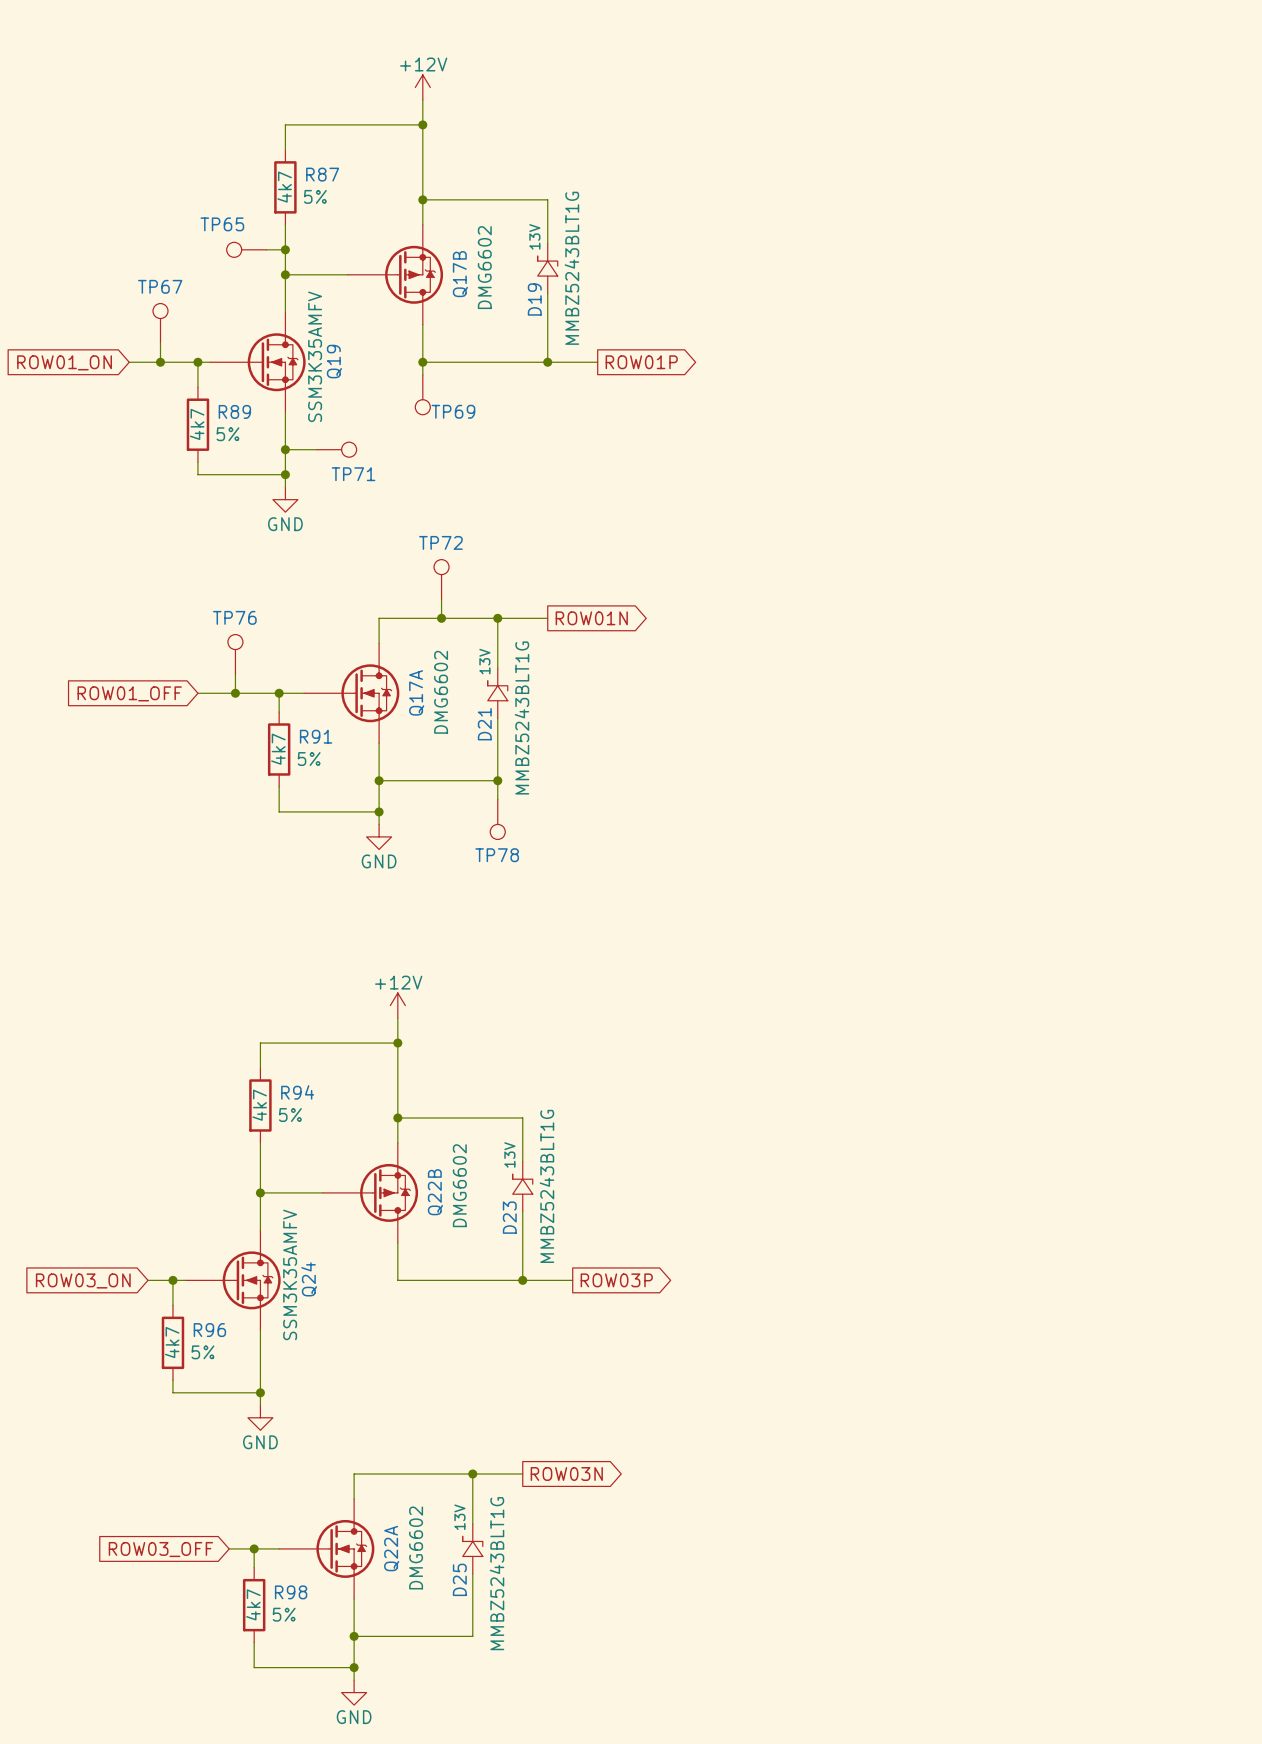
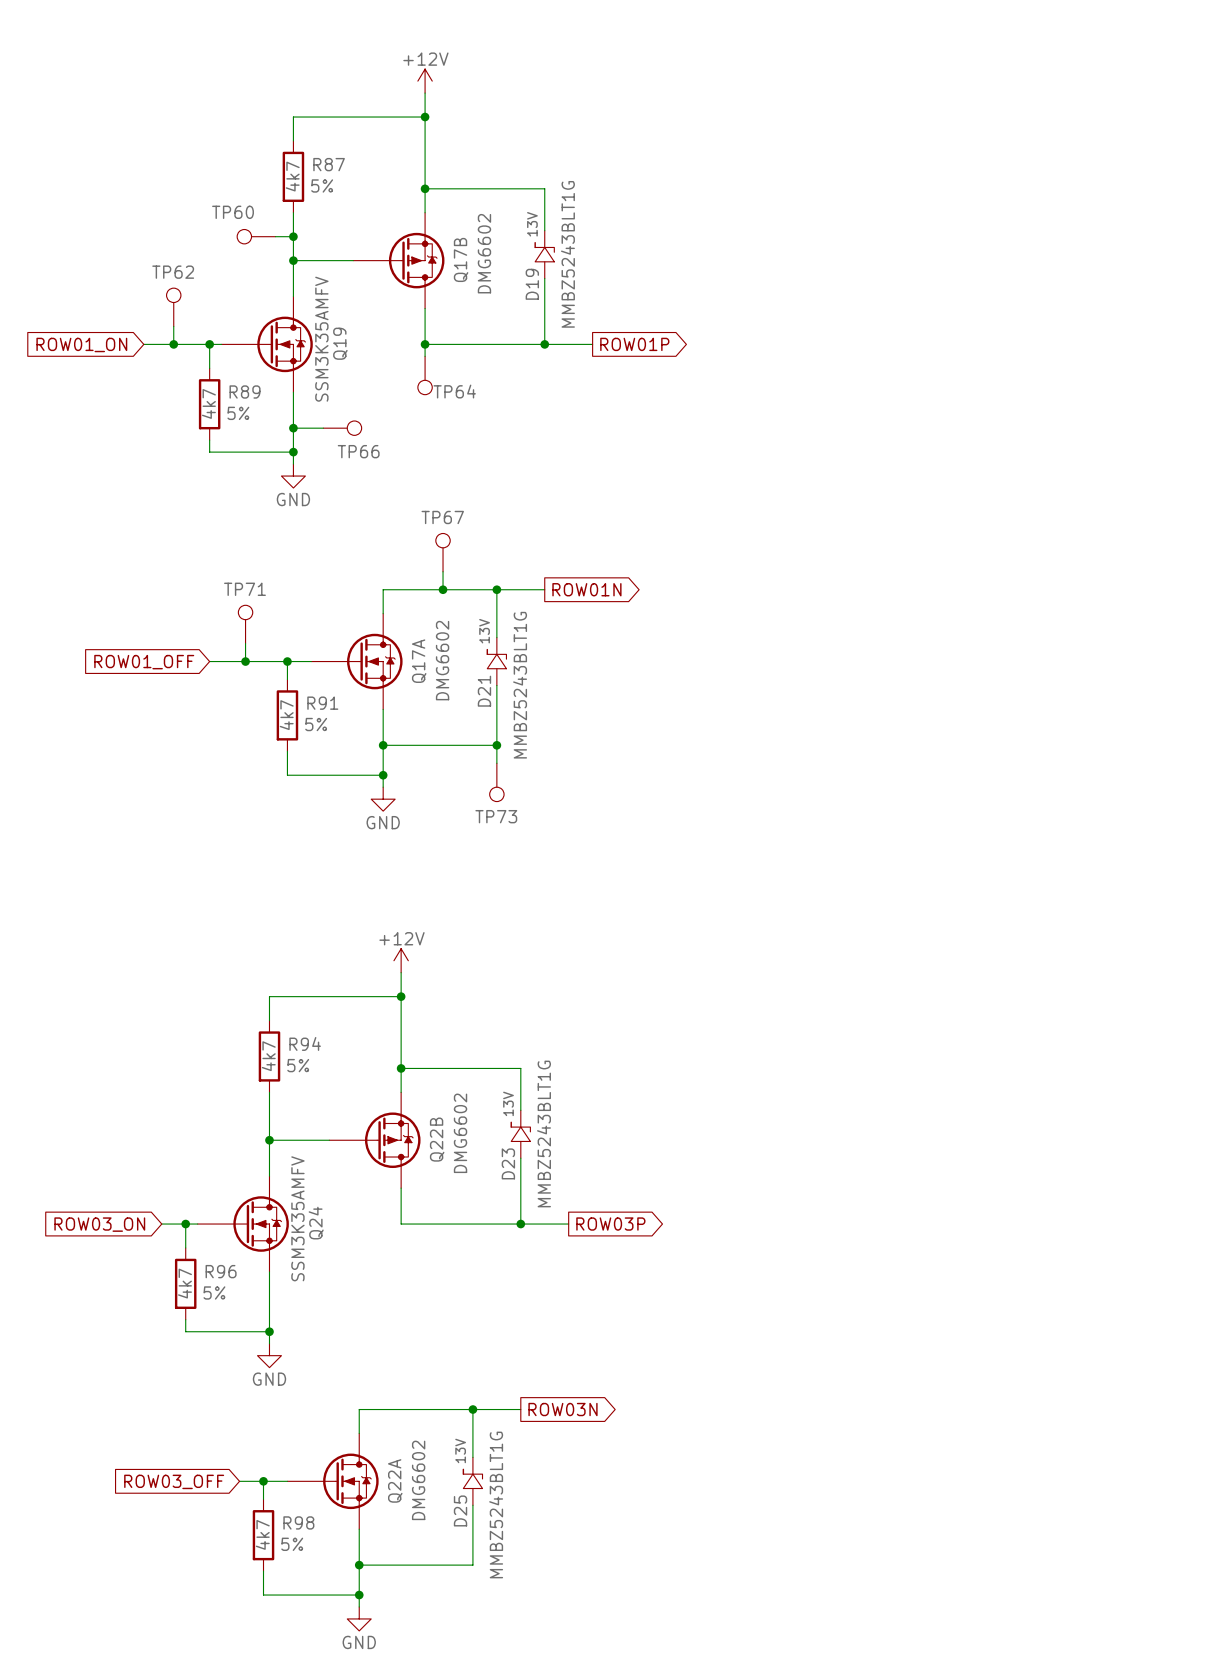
TP65 name: TP65 (222, 224) -> TP60 (233, 212)
TP67 name: TP67 (160, 286) -> TP62 (173, 272)
TP69 name: TP69 (453, 411) -> TP64 (454, 391)
TP71 name: TP71 (353, 474) -> TP66 (358, 451)
TP72 name: TP72 (440, 542) -> TP67 (442, 517)
TP76 name: TP76 (234, 617) -> TP71 (244, 589)
TP78 name: TP78 (497, 855) -> TP73 (496, 816)

